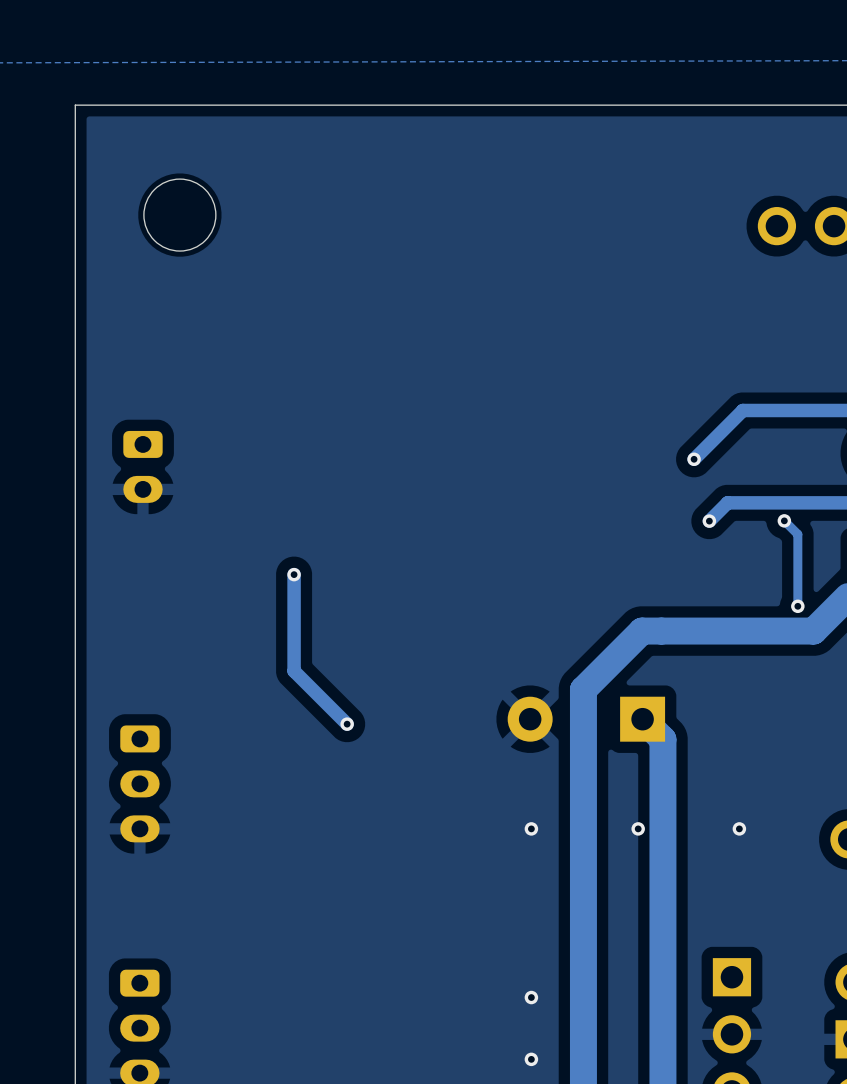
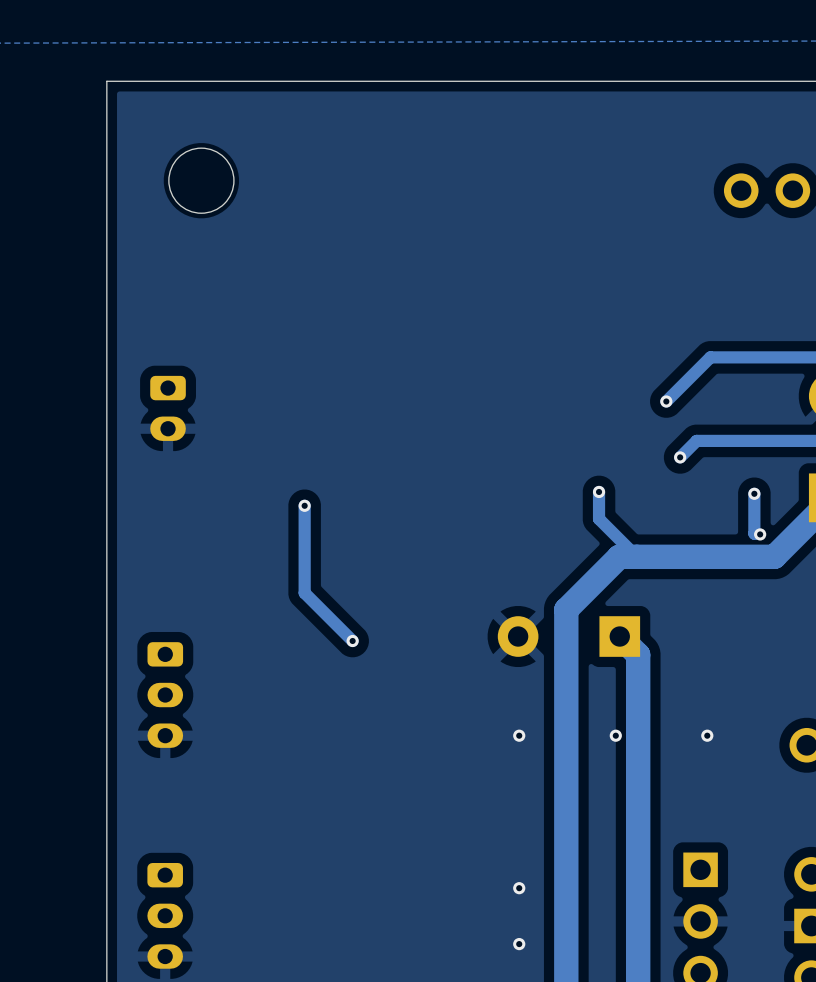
track: (784, 520) (797, 534) (797, 606) -> none
via position: (784, 520) -> (754, 493)
track: none -> (599, 491) (599, 519) (636, 556)
via: none -> (599, 491)
track: none -> (754, 493) (754, 533)

